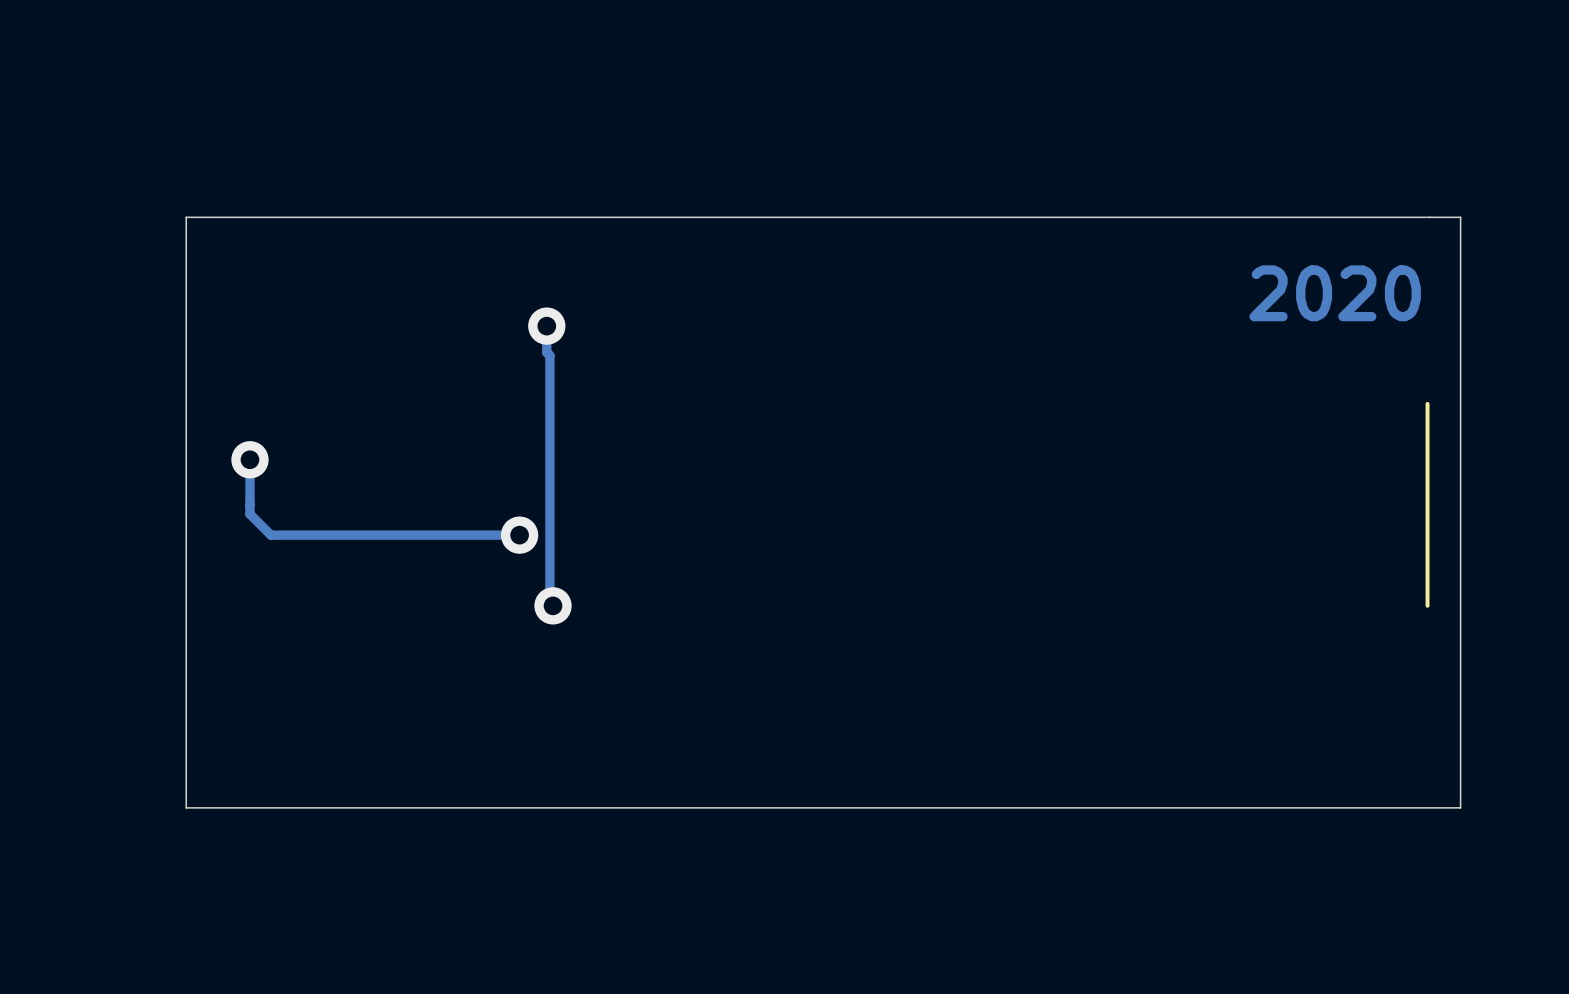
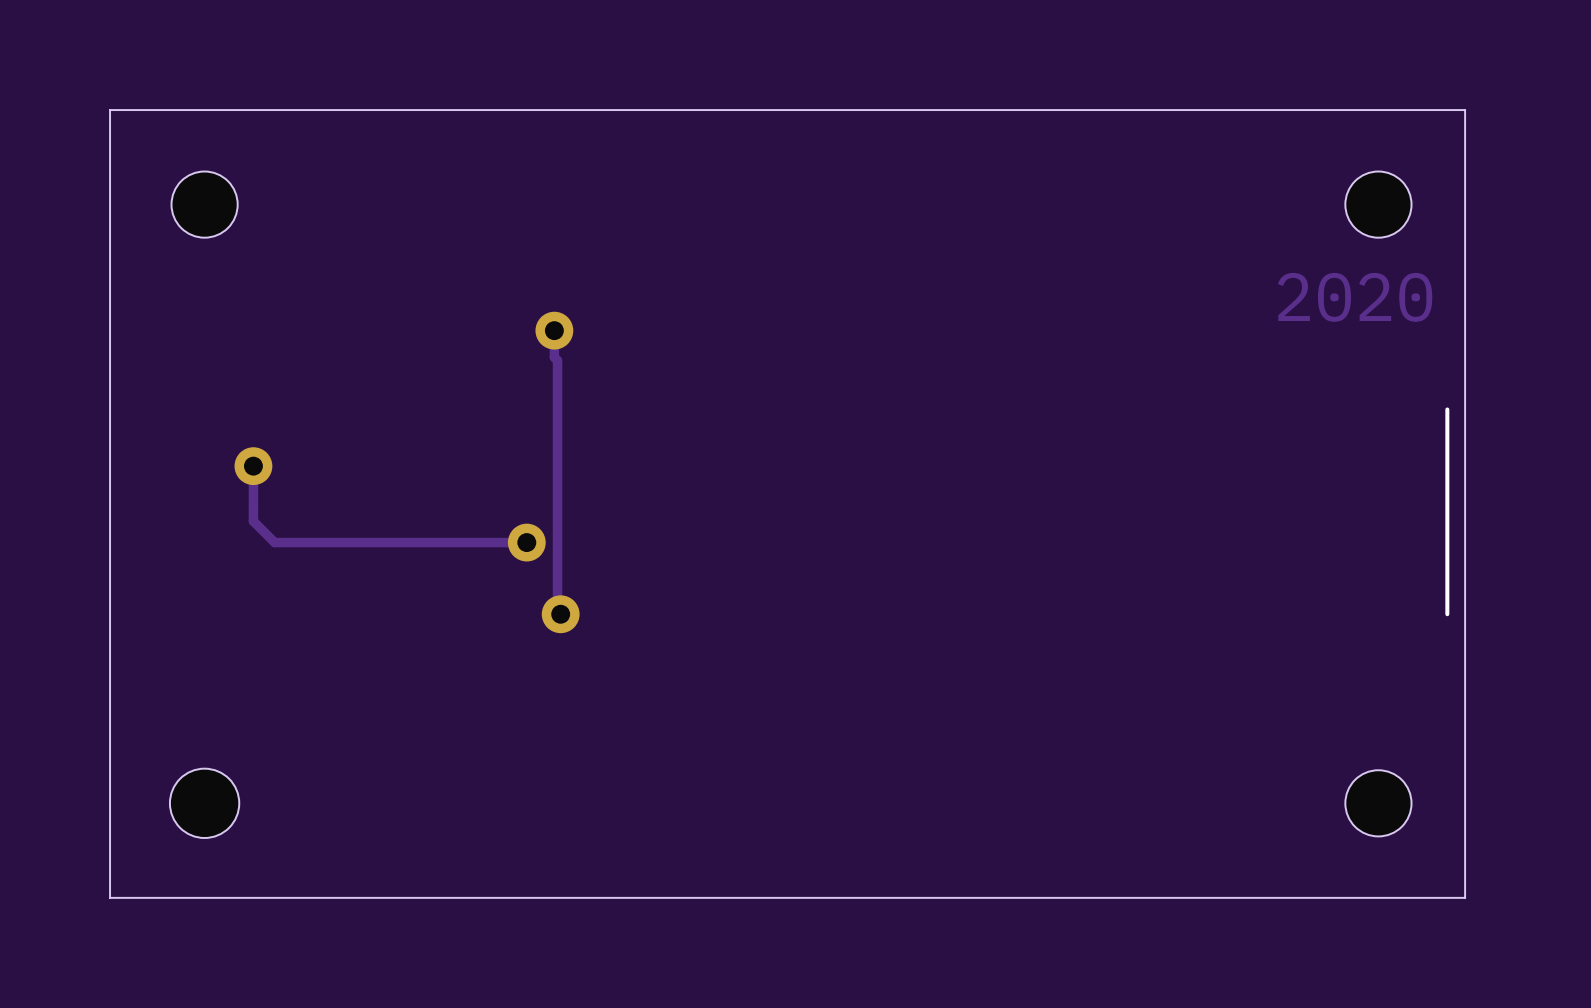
part: none -> (204, 204)
part: none -> (1378, 204)
board edge: (1460, 217) (186, 217) (186, 807) (1460, 807) (1460, 217) -> (1465, 110) (1465, 897) (110, 897) (110, 110) (1465, 110)
part: none -> (204, 803)
part: none -> (1378, 803)

